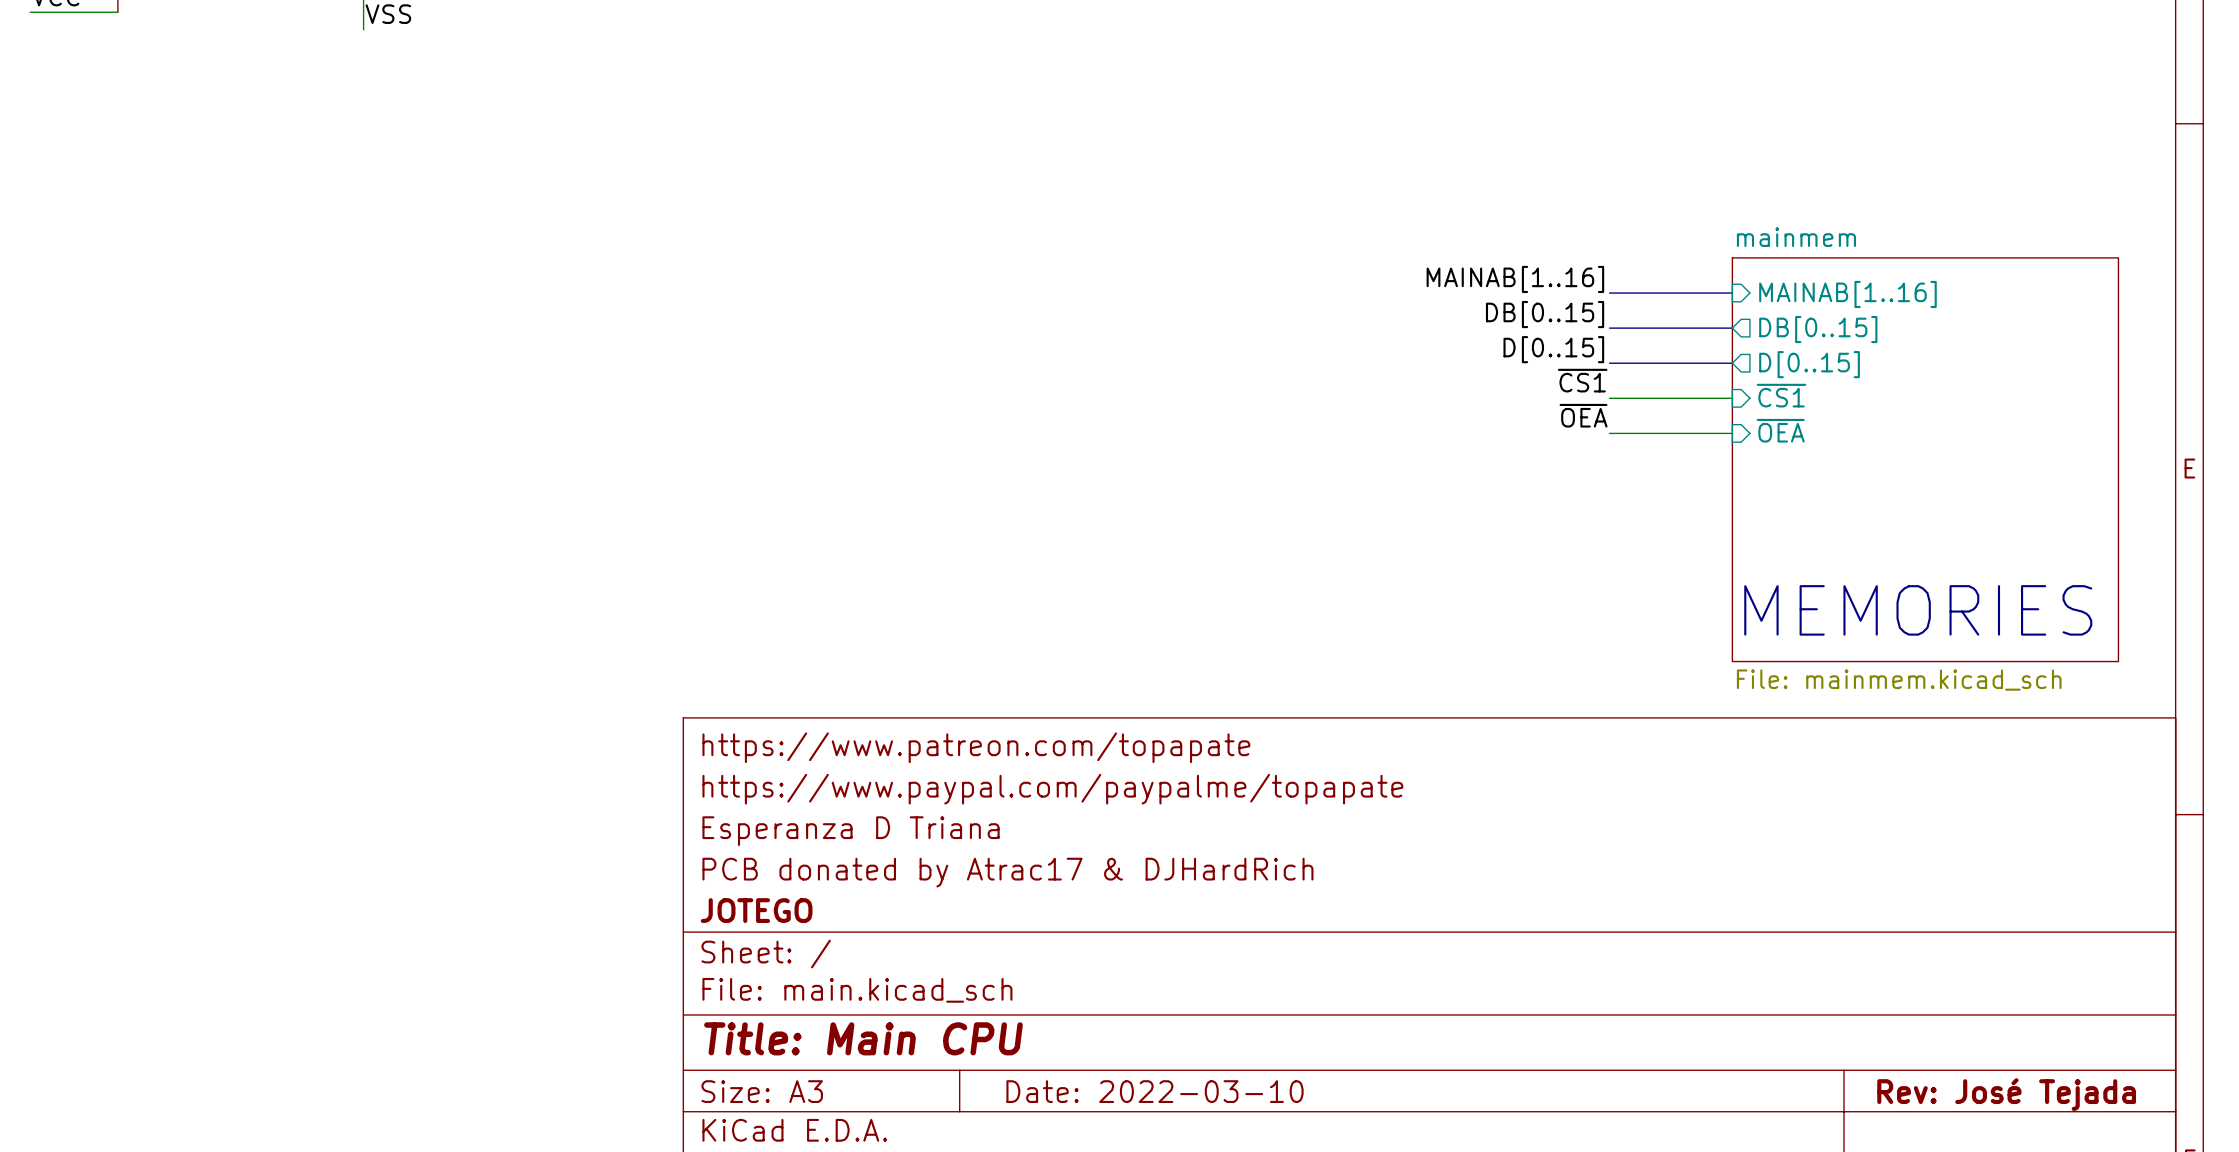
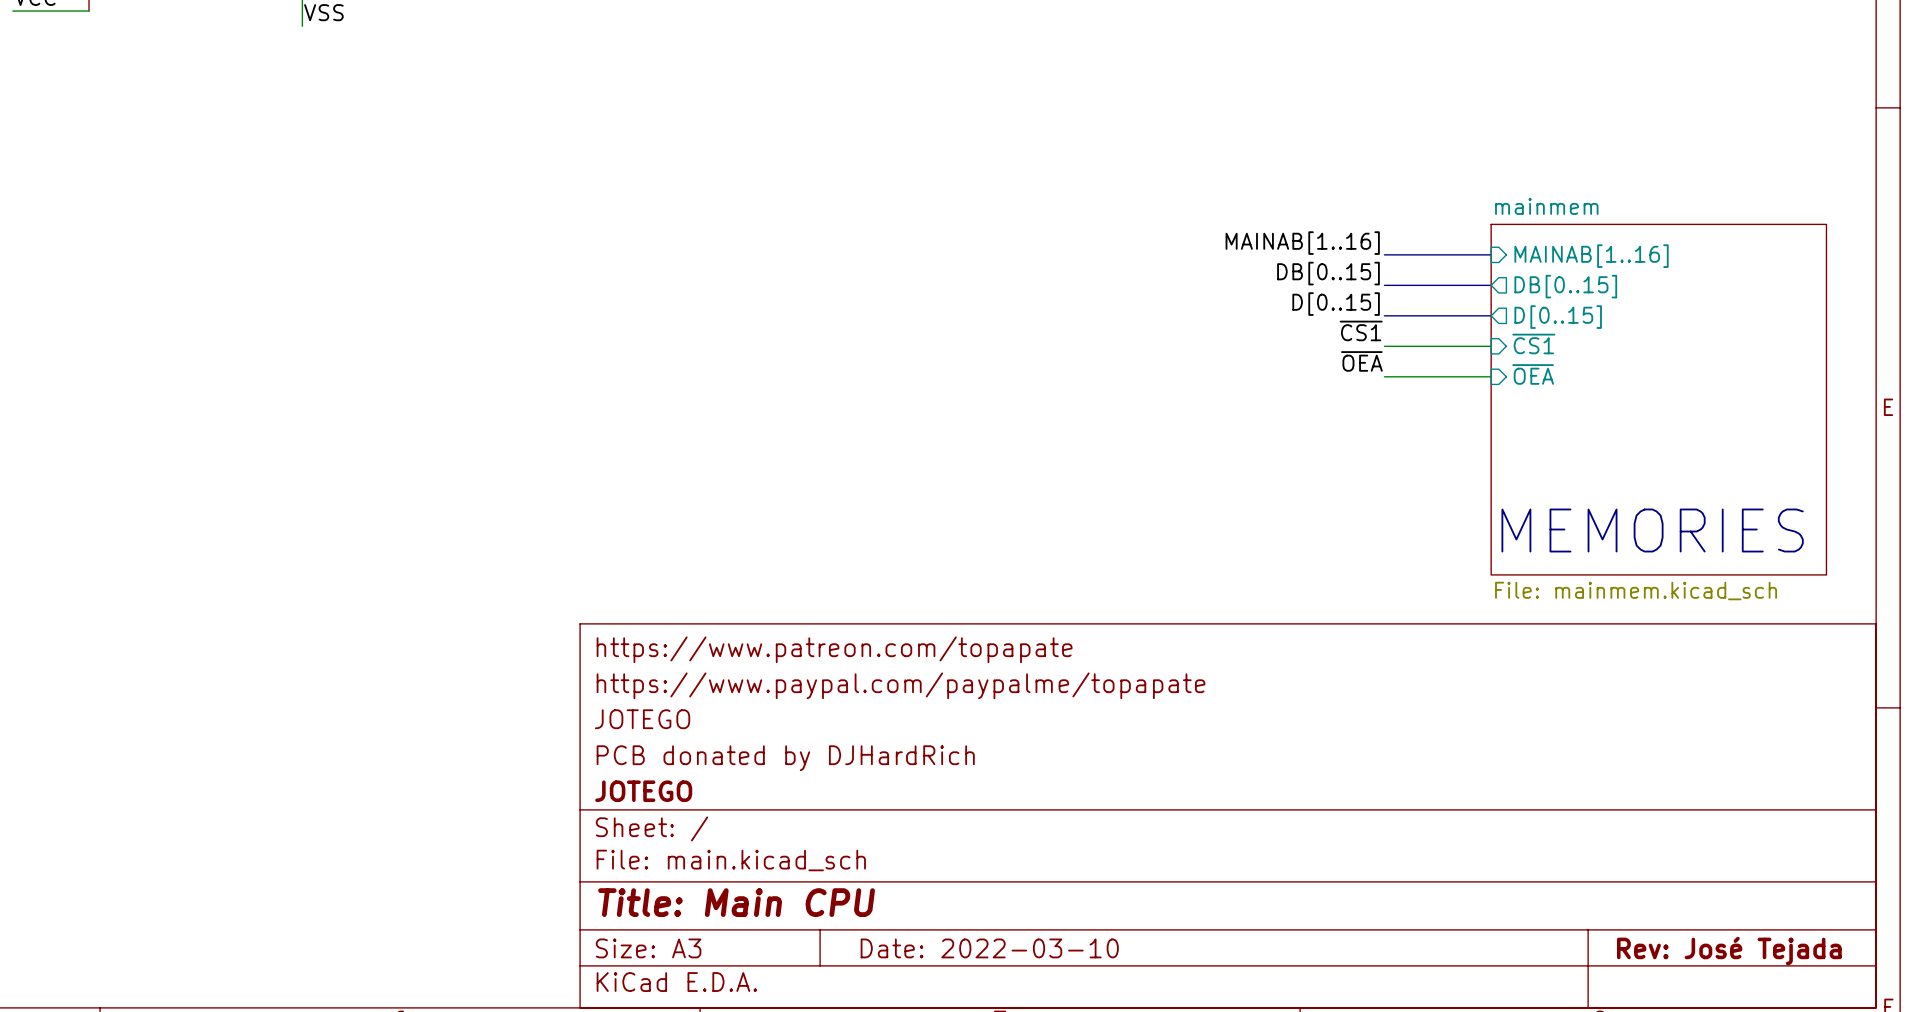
title block: Esperanza D Triana (851, 831) -> JOTEGO (642, 719)
title block: PCB donated by Atrac17 & DJHardRich (1007, 872) -> PCB donated by DJHardRich (785, 758)

